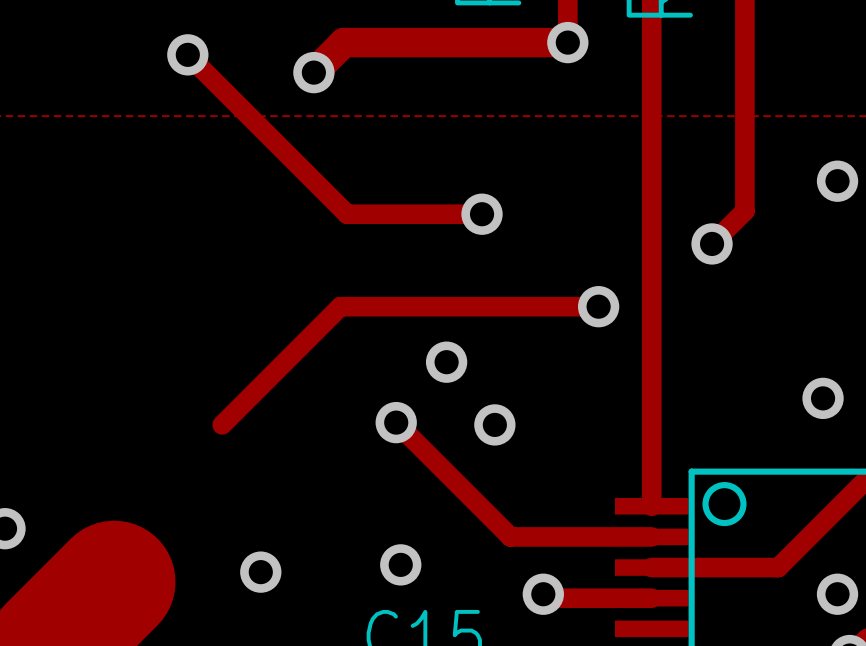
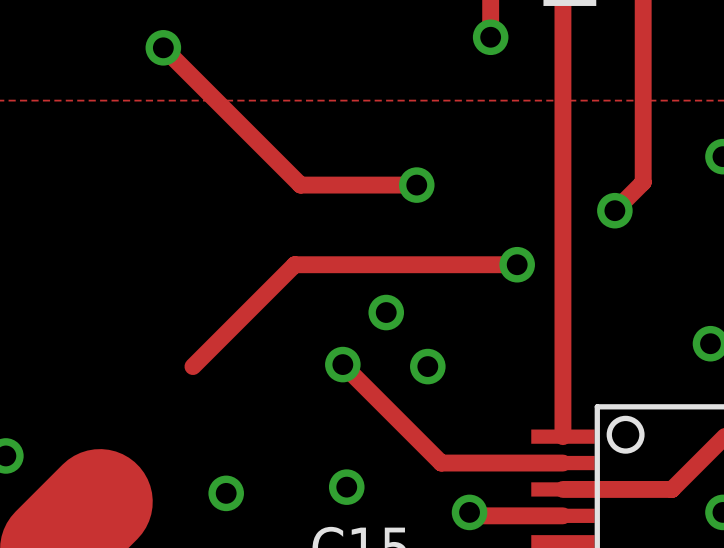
track: (567, 42) (343, 42) (313, 72) -> none
via: (313, 72) -> none

